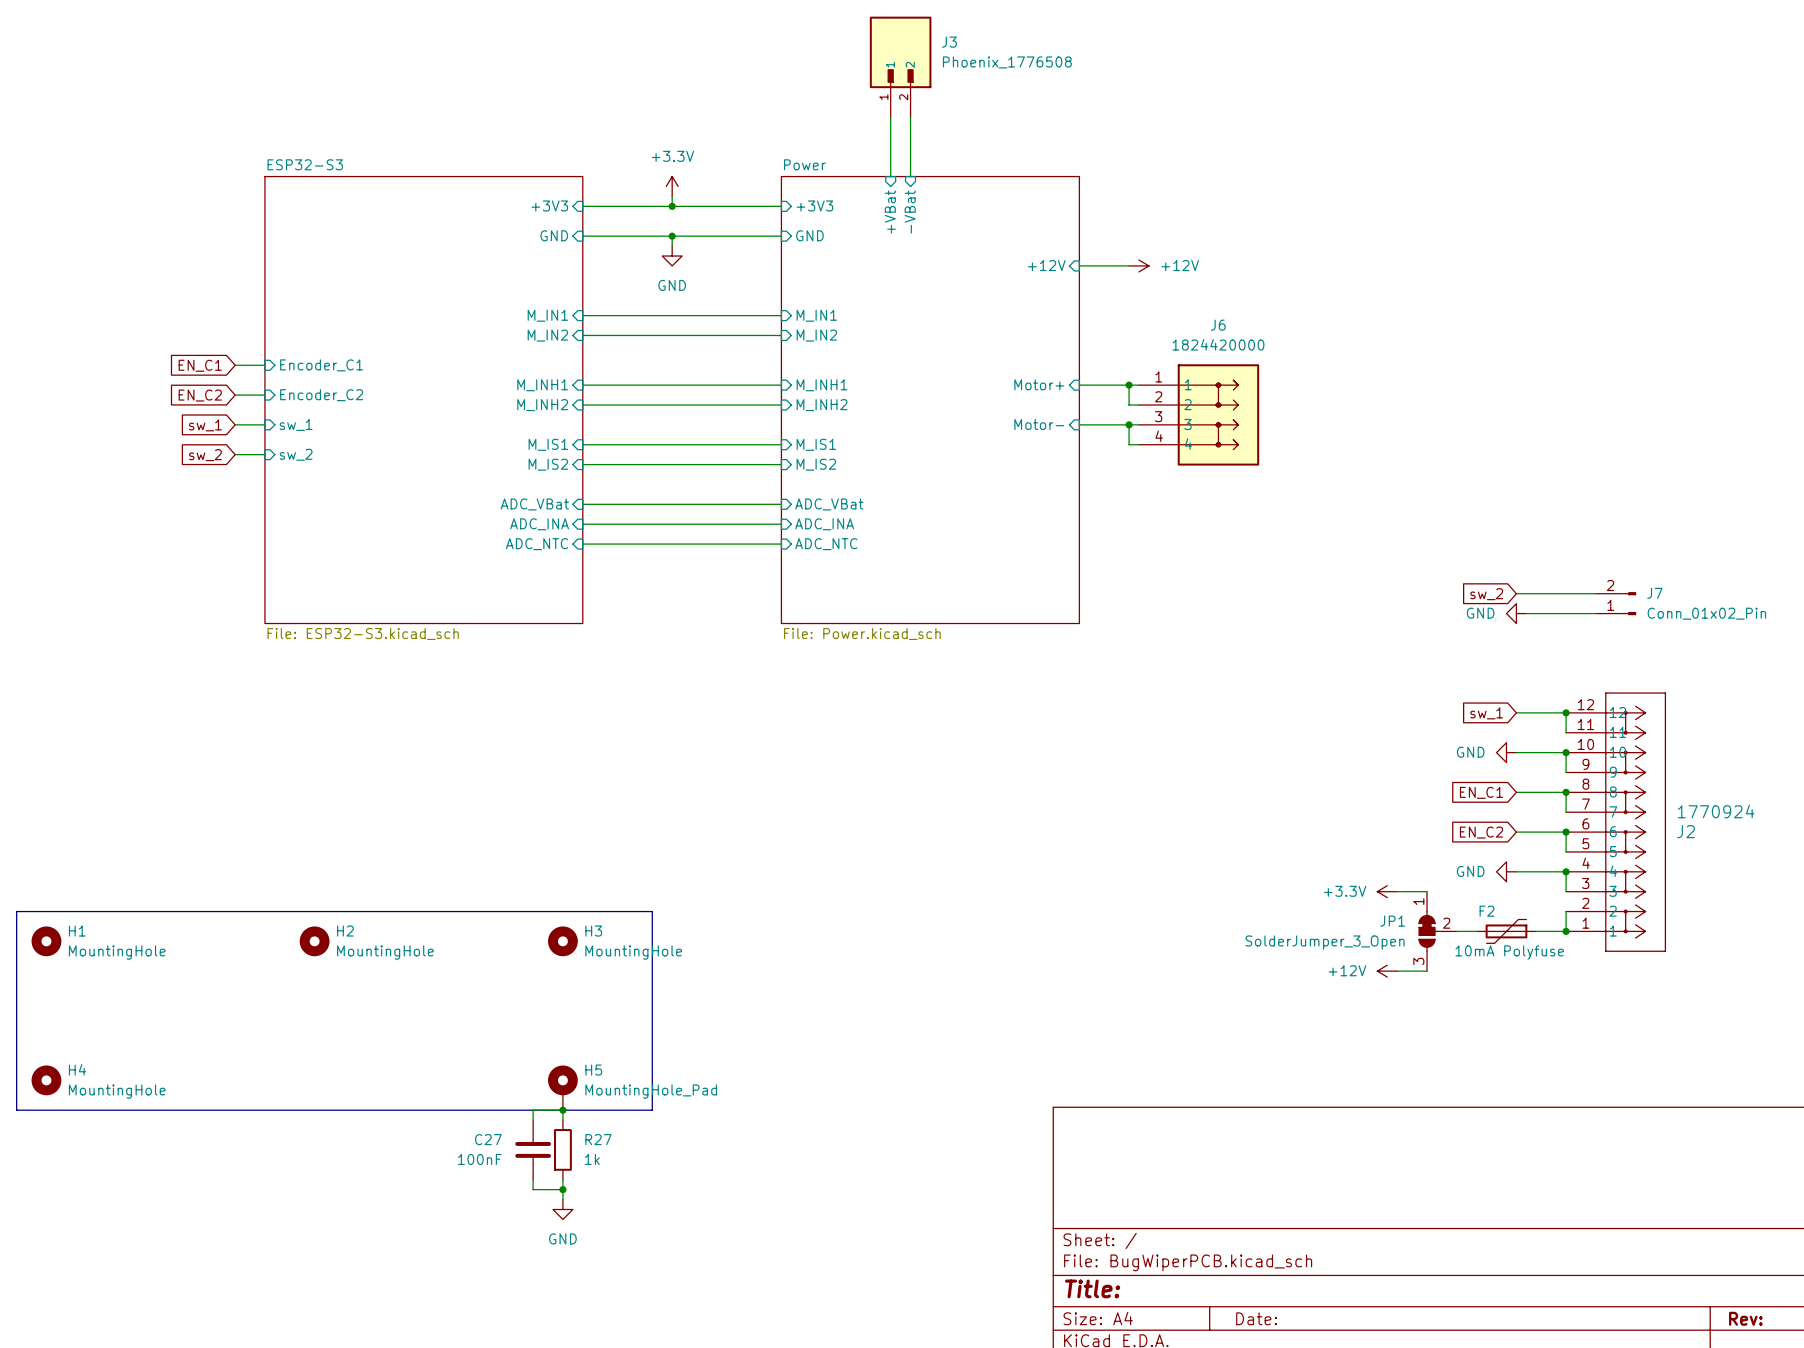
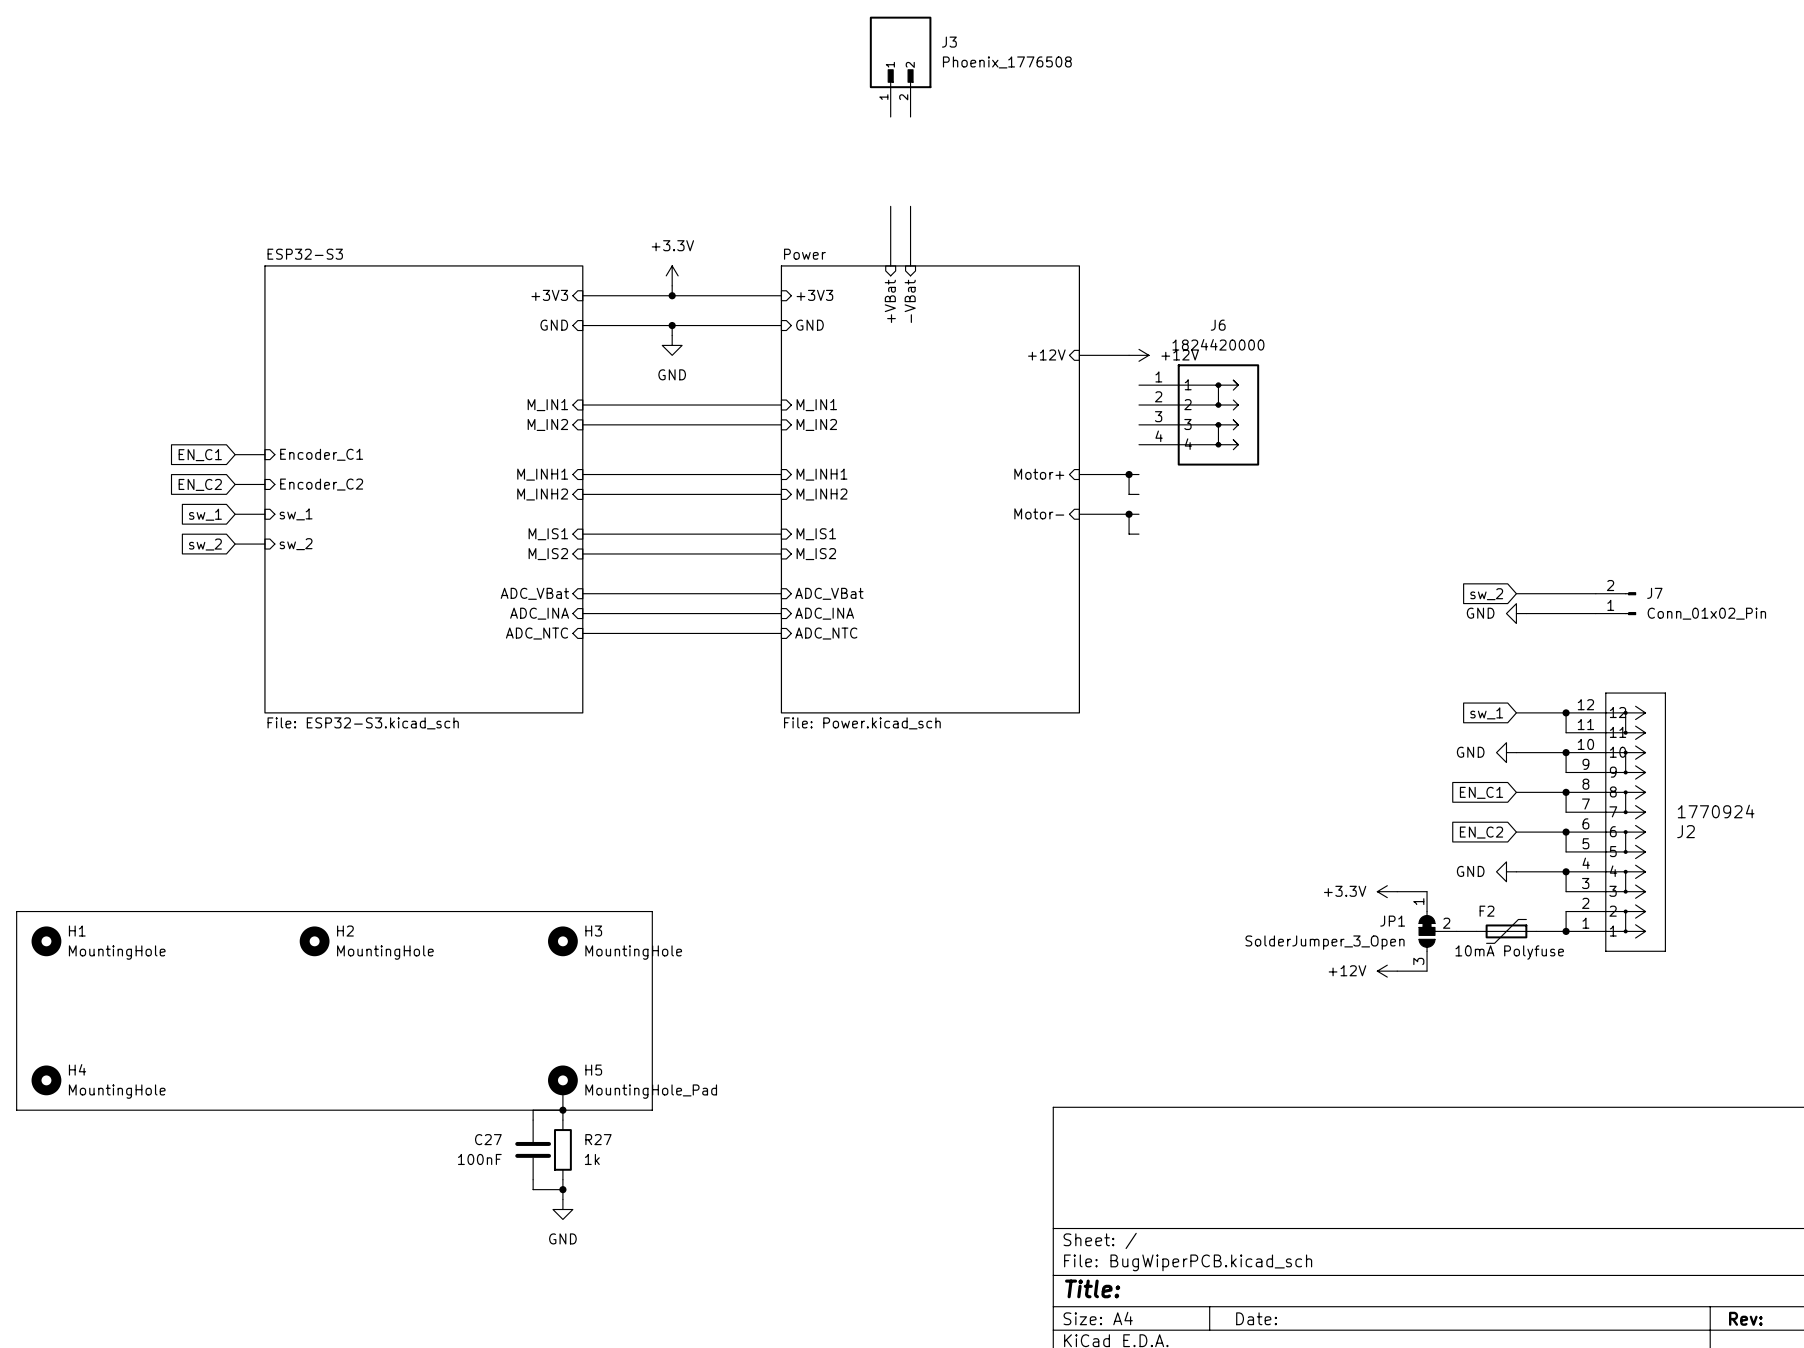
wire: (890, 116) (890, 176) -> (890, 206) (890, 265)
wire: (910, 116) (910, 176) -> (910, 206) (910, 265)
power symbol position: +3.3V (672, 186) -> +3.3V (672, 275)
wire: (672, 196) (672, 206) -> (672, 285) (672, 295)
sheet pin position: +3V3 (549, 205) -> +3V3 (549, 295)
sheet pin position: +3V3 (814, 205) -> +3V3 (814, 295)
wire: (582, 206) (781, 206) -> (582, 295) (781, 295)
junction: (672, 206) -> none
sheet pin position: +VBat (890, 211) -> +VBat (890, 301)
sheet pin position: -VBat (910, 211) -> -VBat (910, 301)
sheet pin position: GND (554, 235) -> GND (554, 325)
sheet pin position: GND (809, 235) -> GND (809, 325)
wire: (582, 236) (781, 236) -> (582, 325) (781, 325)
wire: (672, 236) (672, 246) -> (672, 325) (672, 335)
junction: (672, 236) -> none
power symbol position: GND (672, 256) -> GND (672, 345)
sheet pin position: +12V (1046, 265) -> +12V (1046, 354)
wire: (1079, 265) (1129, 265) -> (1079, 355) (1129, 355)
power symbol position: +12V (1138, 265) -> +12V (1138, 355)
junction: none -> (672, 295)
sheet pin: M_IN1 (547, 315) -> none
wire: (582, 315) (781, 315) -> (582, 494) (781, 494)
sheet pin: M_IN1 (816, 315) -> none
junction: none -> (672, 325)
sheet pin position: M_IN2 (547, 335) -> M_IN2 (547, 424)
wire: (582, 335) (781, 335) -> (582, 424) (781, 424)
sheet pin position: M_IN2 (816, 335) -> M_IN2 (816, 424)
global label: EN_C1 (200, 365) -> none
wire: (235, 365) (264, 365) -> (235, 544) (264, 544)
sheet pin: Encoder_C1 (321, 365) -> none
sheet pin position: Motor+ (1039, 384) -> Motor+ (1039, 474)
sheet pin position: M_INH1 (542, 385) -> M_INH1 (542, 474)
wire: (582, 385) (781, 385) -> (582, 474) (781, 474)
sheet pin position: M_INH1 (822, 385) -> M_INH1 (822, 474)
wire: (1079, 385) (1138, 385) -> (1079, 474) (1138, 474)
wire: (1129, 385) (1129, 405) (1138, 405) -> (1129, 474) (1129, 494) (1138, 494)
junction: (1129, 385) -> none
global label position: EN_C2 (200, 395) -> EN_C2 (200, 484)
wire: (235, 395) (264, 395) -> (235, 484) (264, 484)
sheet pin position: Encoder_C2 (321, 395) -> Encoder_C2 (321, 484)
sheet ESP32-S3 position: (423, 400) -> (423, 489)
sheet Power position: (930, 400) -> (930, 489)
sheet pin: M_INH2 (542, 405) -> M_IN1 (547, 405)
sheet pin: M_INH2 (822, 405) -> M_IN1 (816, 405)
wire: (235, 424) (264, 424) -> (235, 514) (264, 514)
sheet pin position: sw_1 (296, 424) -> sw_1 (296, 514)
sheet pin position: Motor- (1039, 424) -> Motor- (1039, 513)
wire: (1079, 424) (1138, 424) -> (1079, 514) (1138, 514)
wire: (1129, 424) (1129, 444) (1138, 444) -> (1129, 514) (1129, 534) (1138, 534)
junction: (1129, 424) -> none
global label position: sw_1 (205, 425) -> sw_1 (205, 514)
sheet pin position: M_IS1 (548, 444) -> M_IS1 (548, 534)
wire: (582, 444) (781, 444) -> (582, 534) (781, 534)
sheet pin position: M_IS1 (816, 444) -> M_IS1 (816, 534)
sheet pin: sw_2 (296, 454) -> Encoder_C1 (321, 454)
global label: sw_2 (205, 455) -> EN_C1 (200, 455)
sheet pin position: M_IS2 (548, 464) -> M_IS2 (548, 554)
wire: (582, 464) (781, 464) -> (582, 553) (781, 553)
sheet pin position: M_IS2 (816, 464) -> M_IS2 (816, 554)
junction: none -> (1129, 474)
sheet pin: none -> M_INH2 (542, 494)
sheet pin: none -> M_INH2 (822, 494)
sheet pin position: ADC_VBat (534, 504) -> ADC_VBat (534, 593)
wire: (582, 504) (781, 504) -> (582, 593) (781, 593)
sheet pin position: ADC_VBat (829, 504) -> ADC_VBat (829, 593)
junction: none -> (1129, 514)
sheet pin position: ADC_INA (539, 524) -> ADC_INA (539, 613)
wire: (582, 524) (781, 524) -> (582, 613) (781, 613)
sheet pin position: ADC_INA (824, 524) -> ADC_INA (824, 613)
global label: none -> sw_2 (205, 544)
sheet pin: none -> sw_2 (296, 544)
sheet pin position: ADC_NTC (536, 544) -> ADC_NTC (536, 633)
wire: (582, 544) (781, 544) -> (582, 633) (781, 633)
sheet pin position: ADC_NTC (826, 544) -> ADC_NTC (826, 633)

